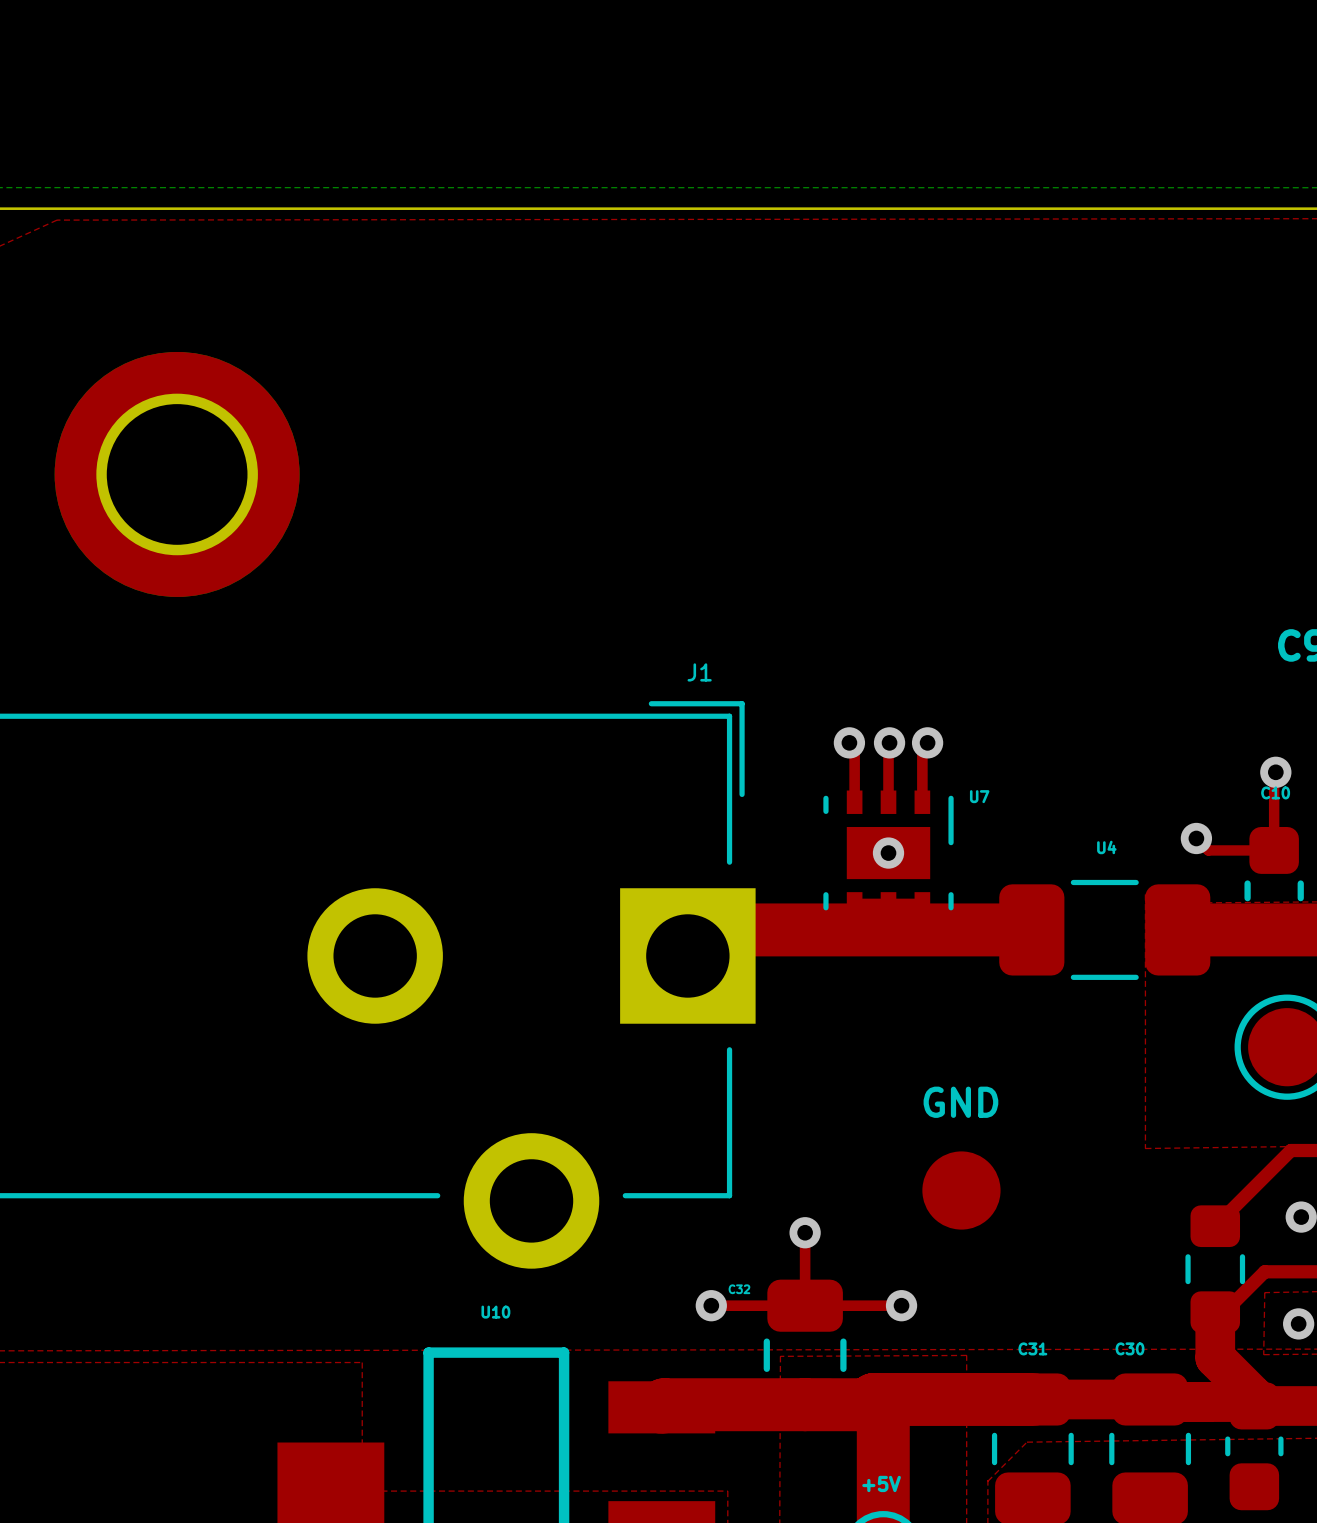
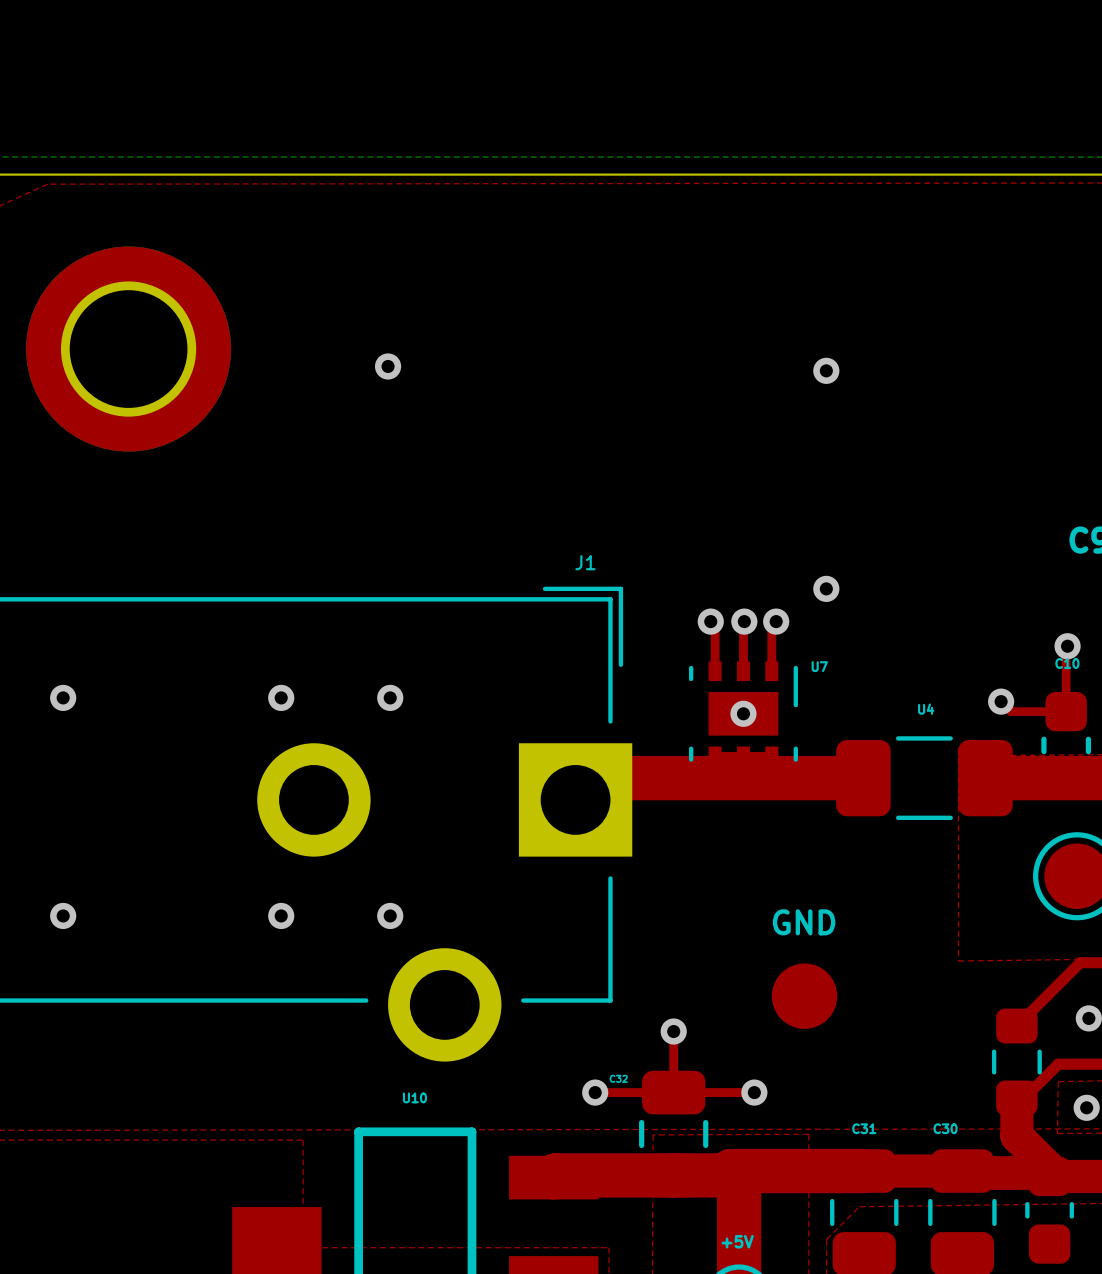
via: none -> (388, 366)
via: none -> (826, 370)
part position: (177, 474) -> (128, 349)
via: none -> (826, 588)
via: none -> (63, 697)
via: none -> (281, 697)
via: none -> (390, 697)
via: none -> (63, 915)
via: none -> (281, 915)
via: none -> (390, 915)

